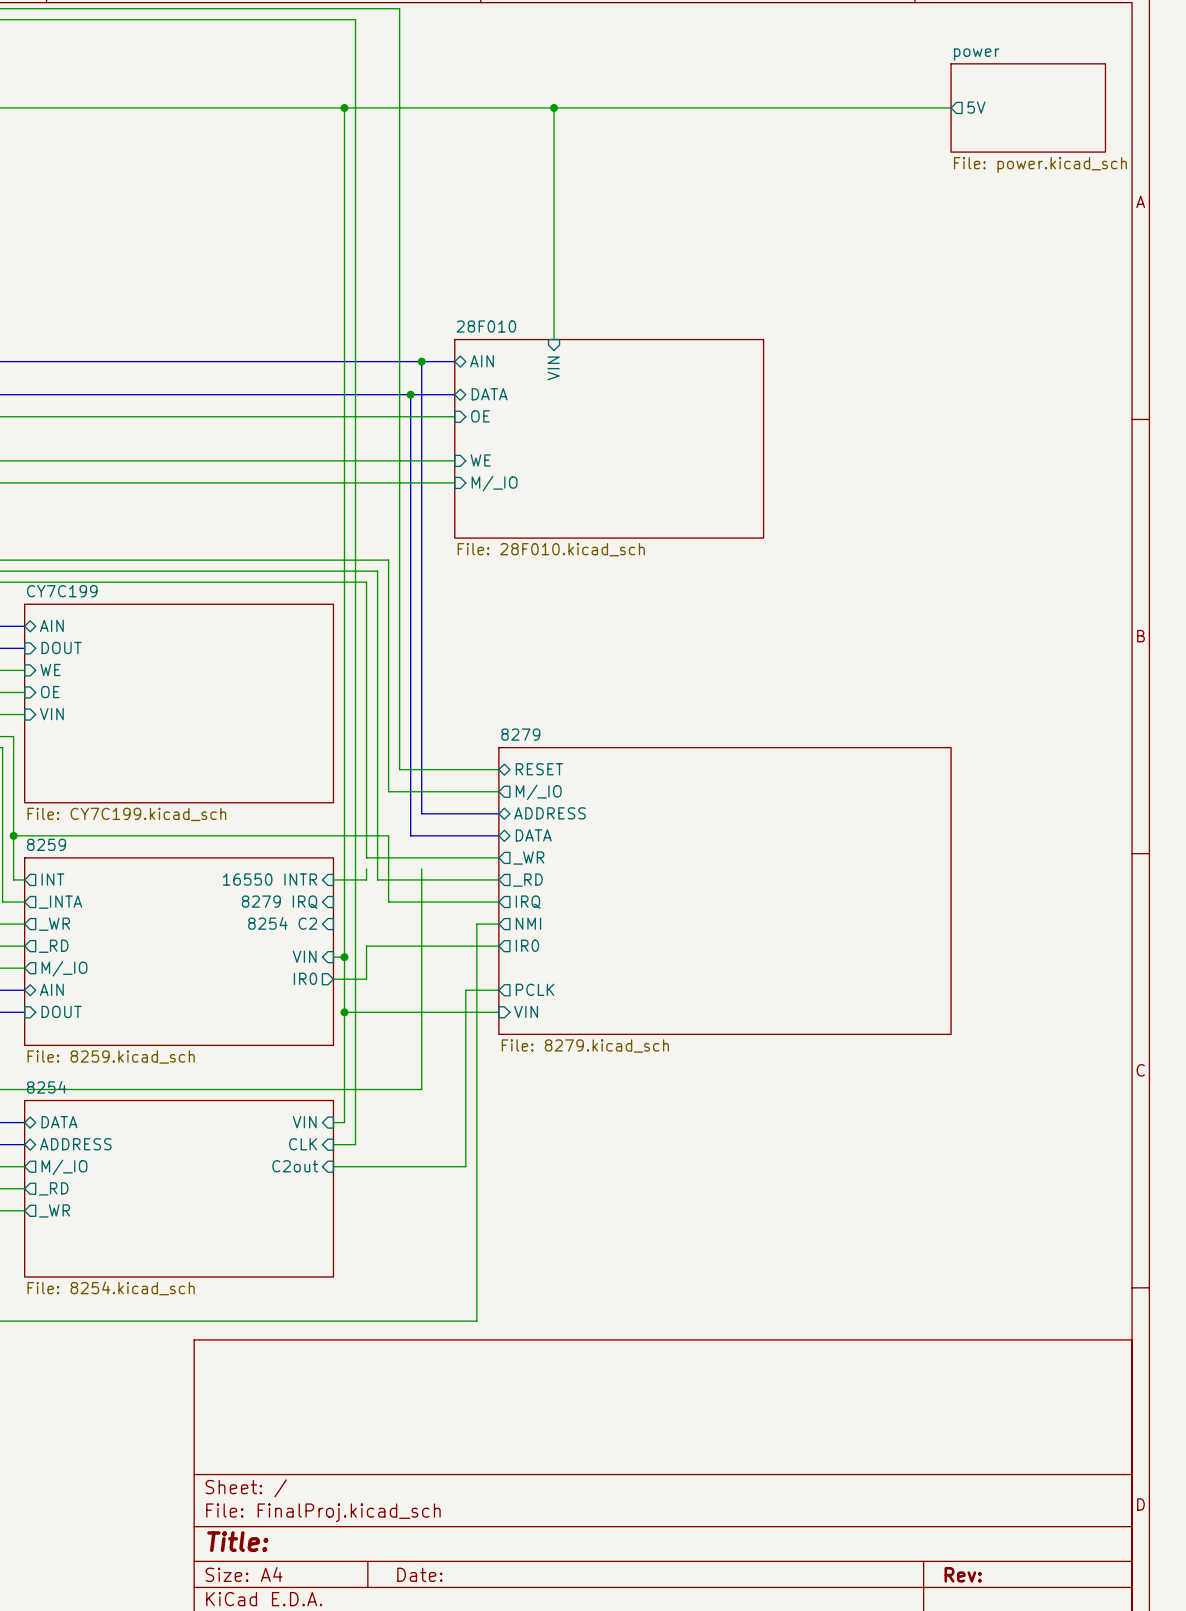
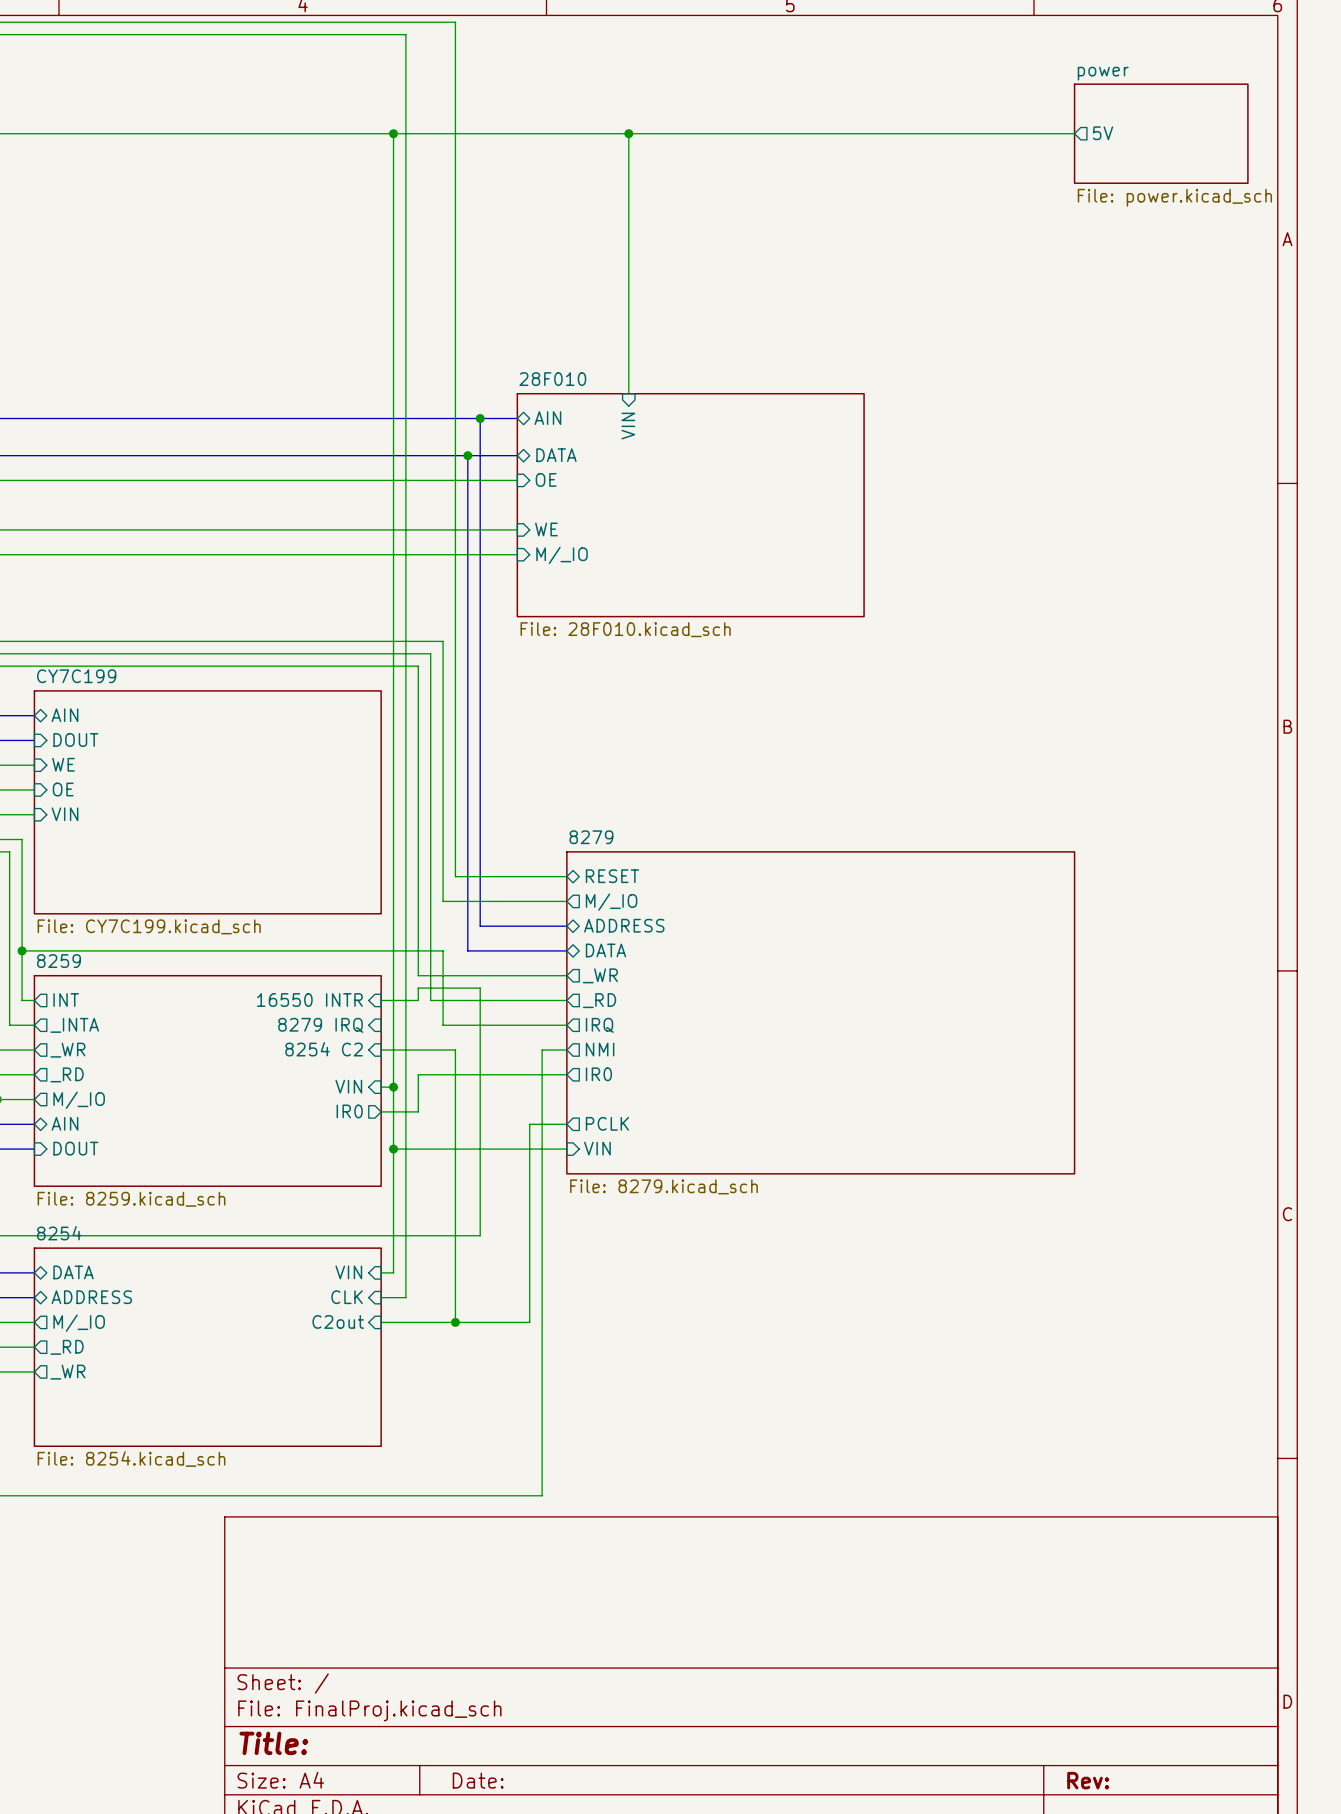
wire: none -> (418, 988) (480, 988)
wire: none -> (381, 1050) (455, 1050) (455, 1322)
junction: none -> (455, 1322)

